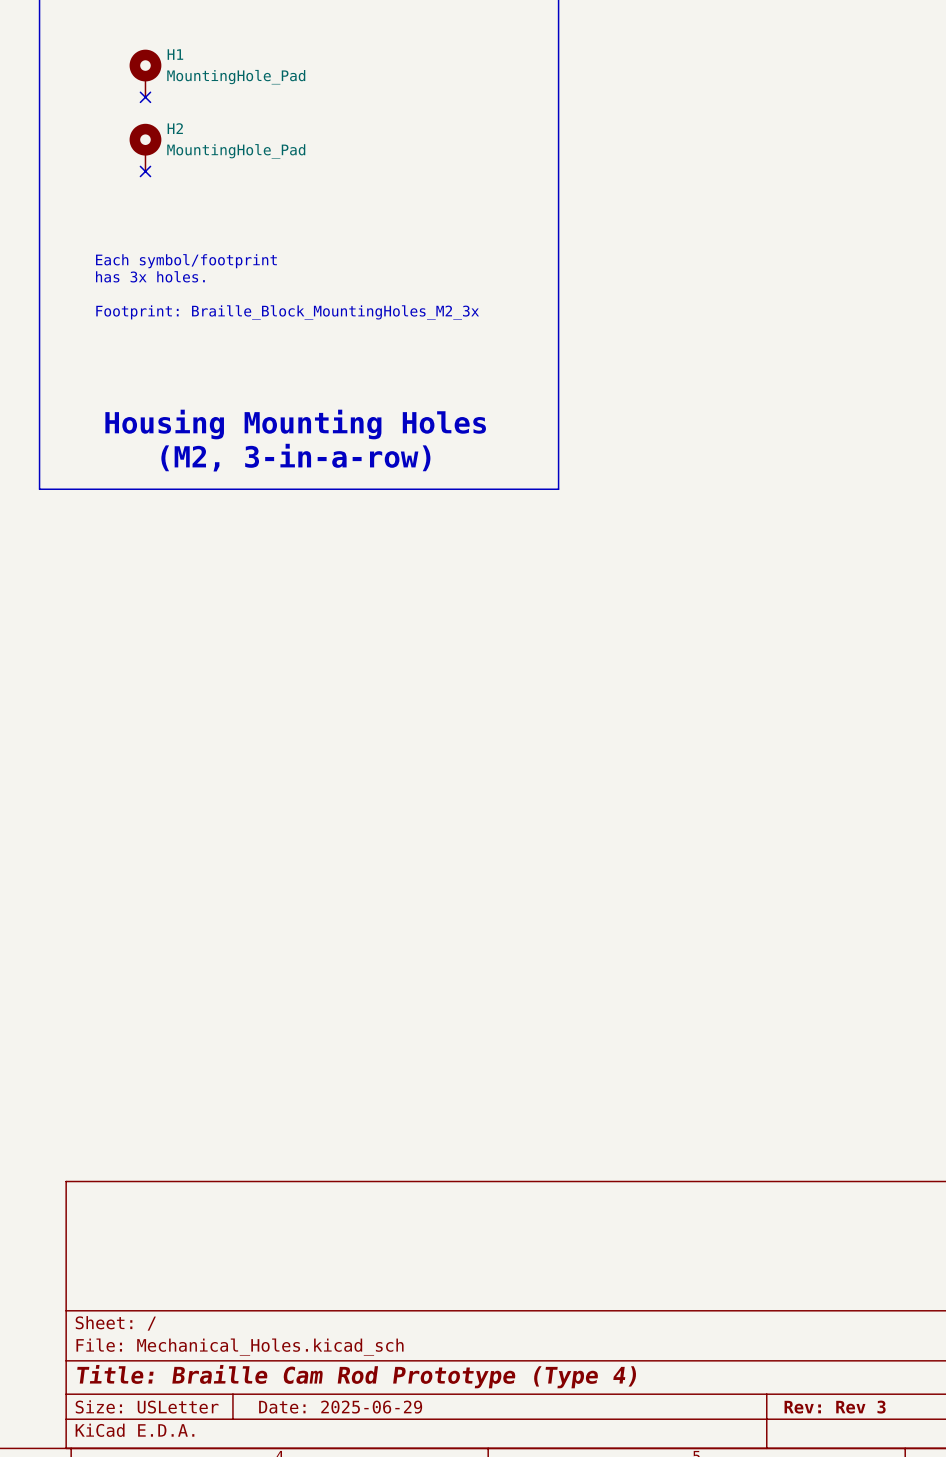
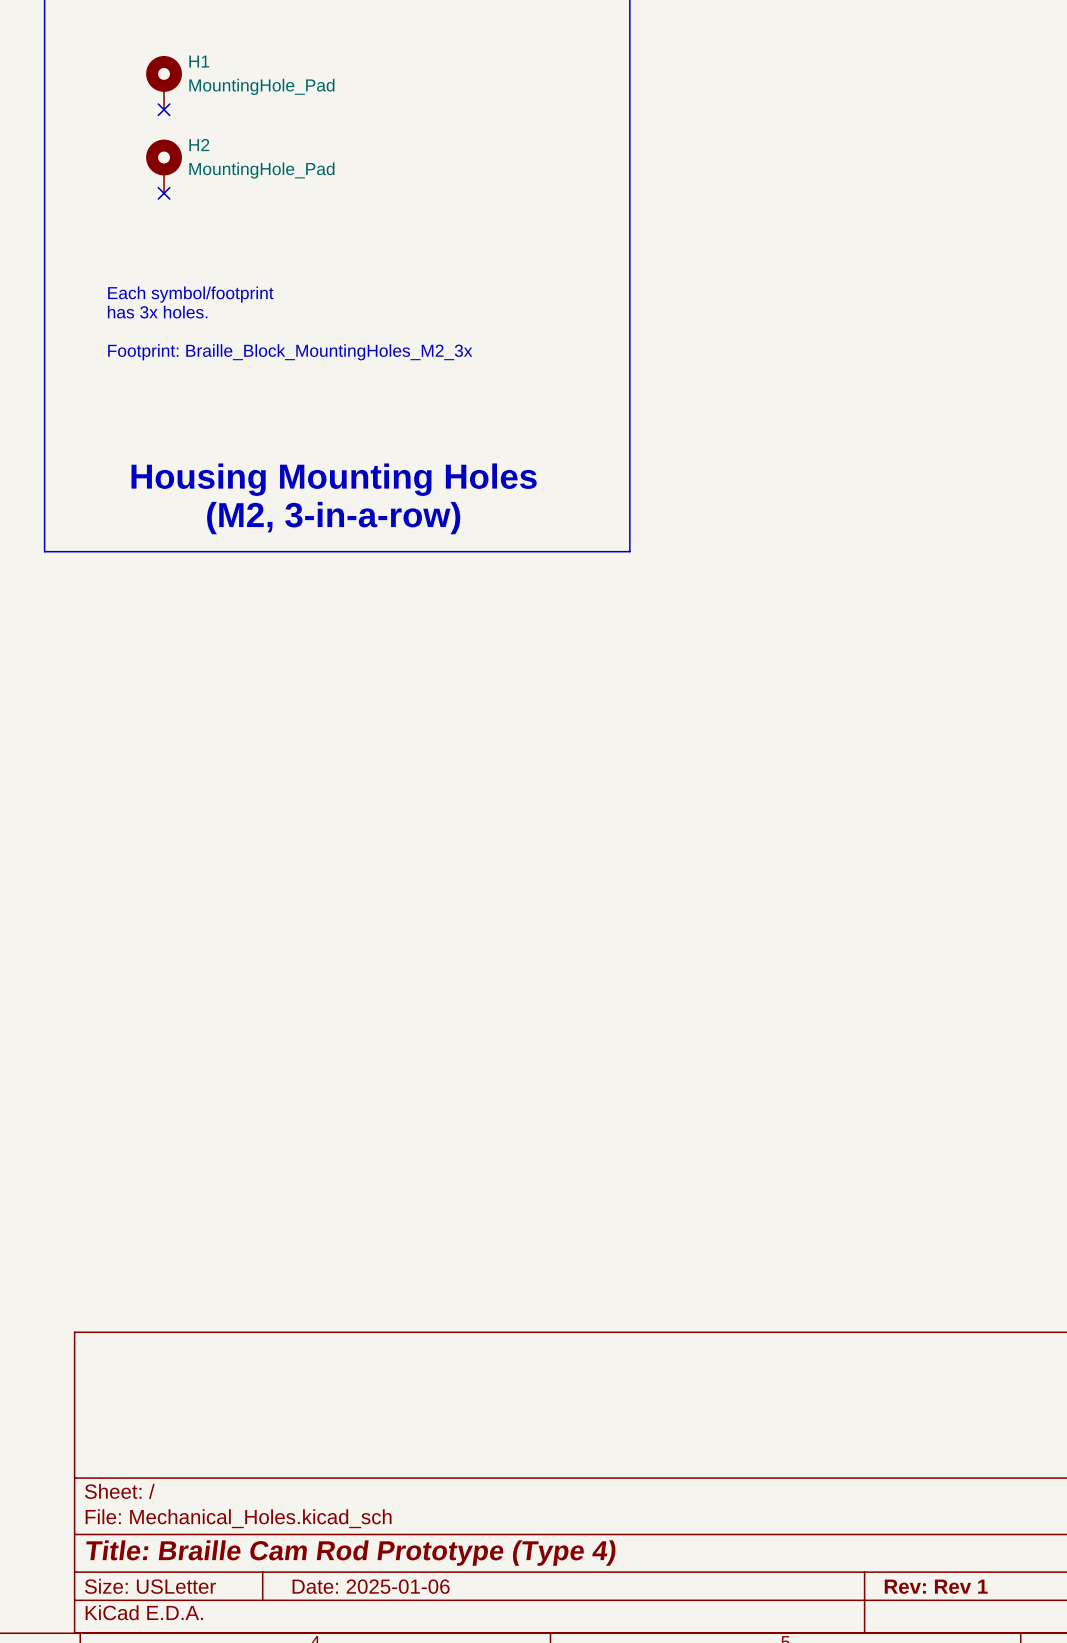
title block: Date: 2025-06-29 (340, 1407) -> Date: 2025-01-06 (371, 1586)
title block: Rev: Rev 3 (835, 1407) -> Rev: Rev 1 (936, 1586)

